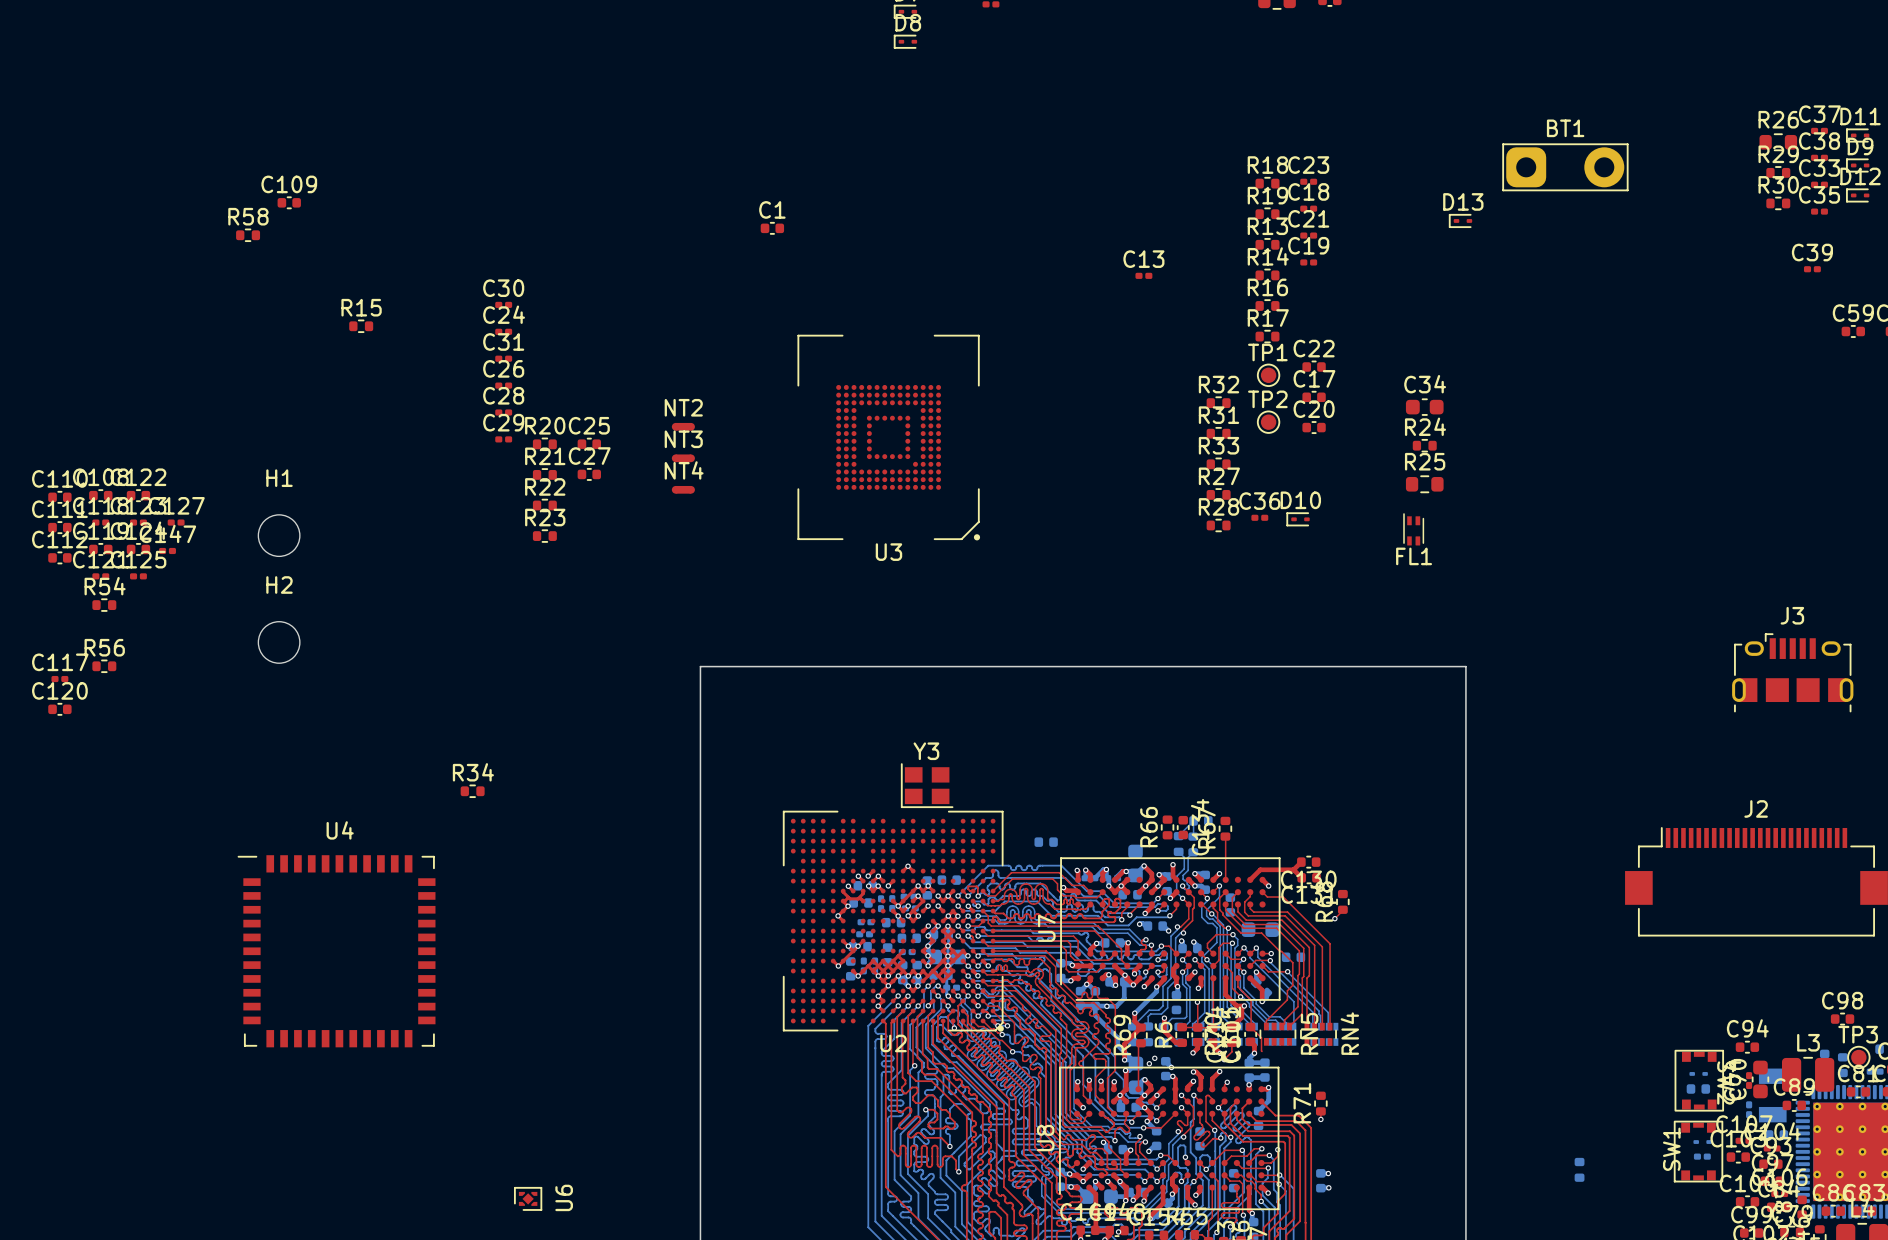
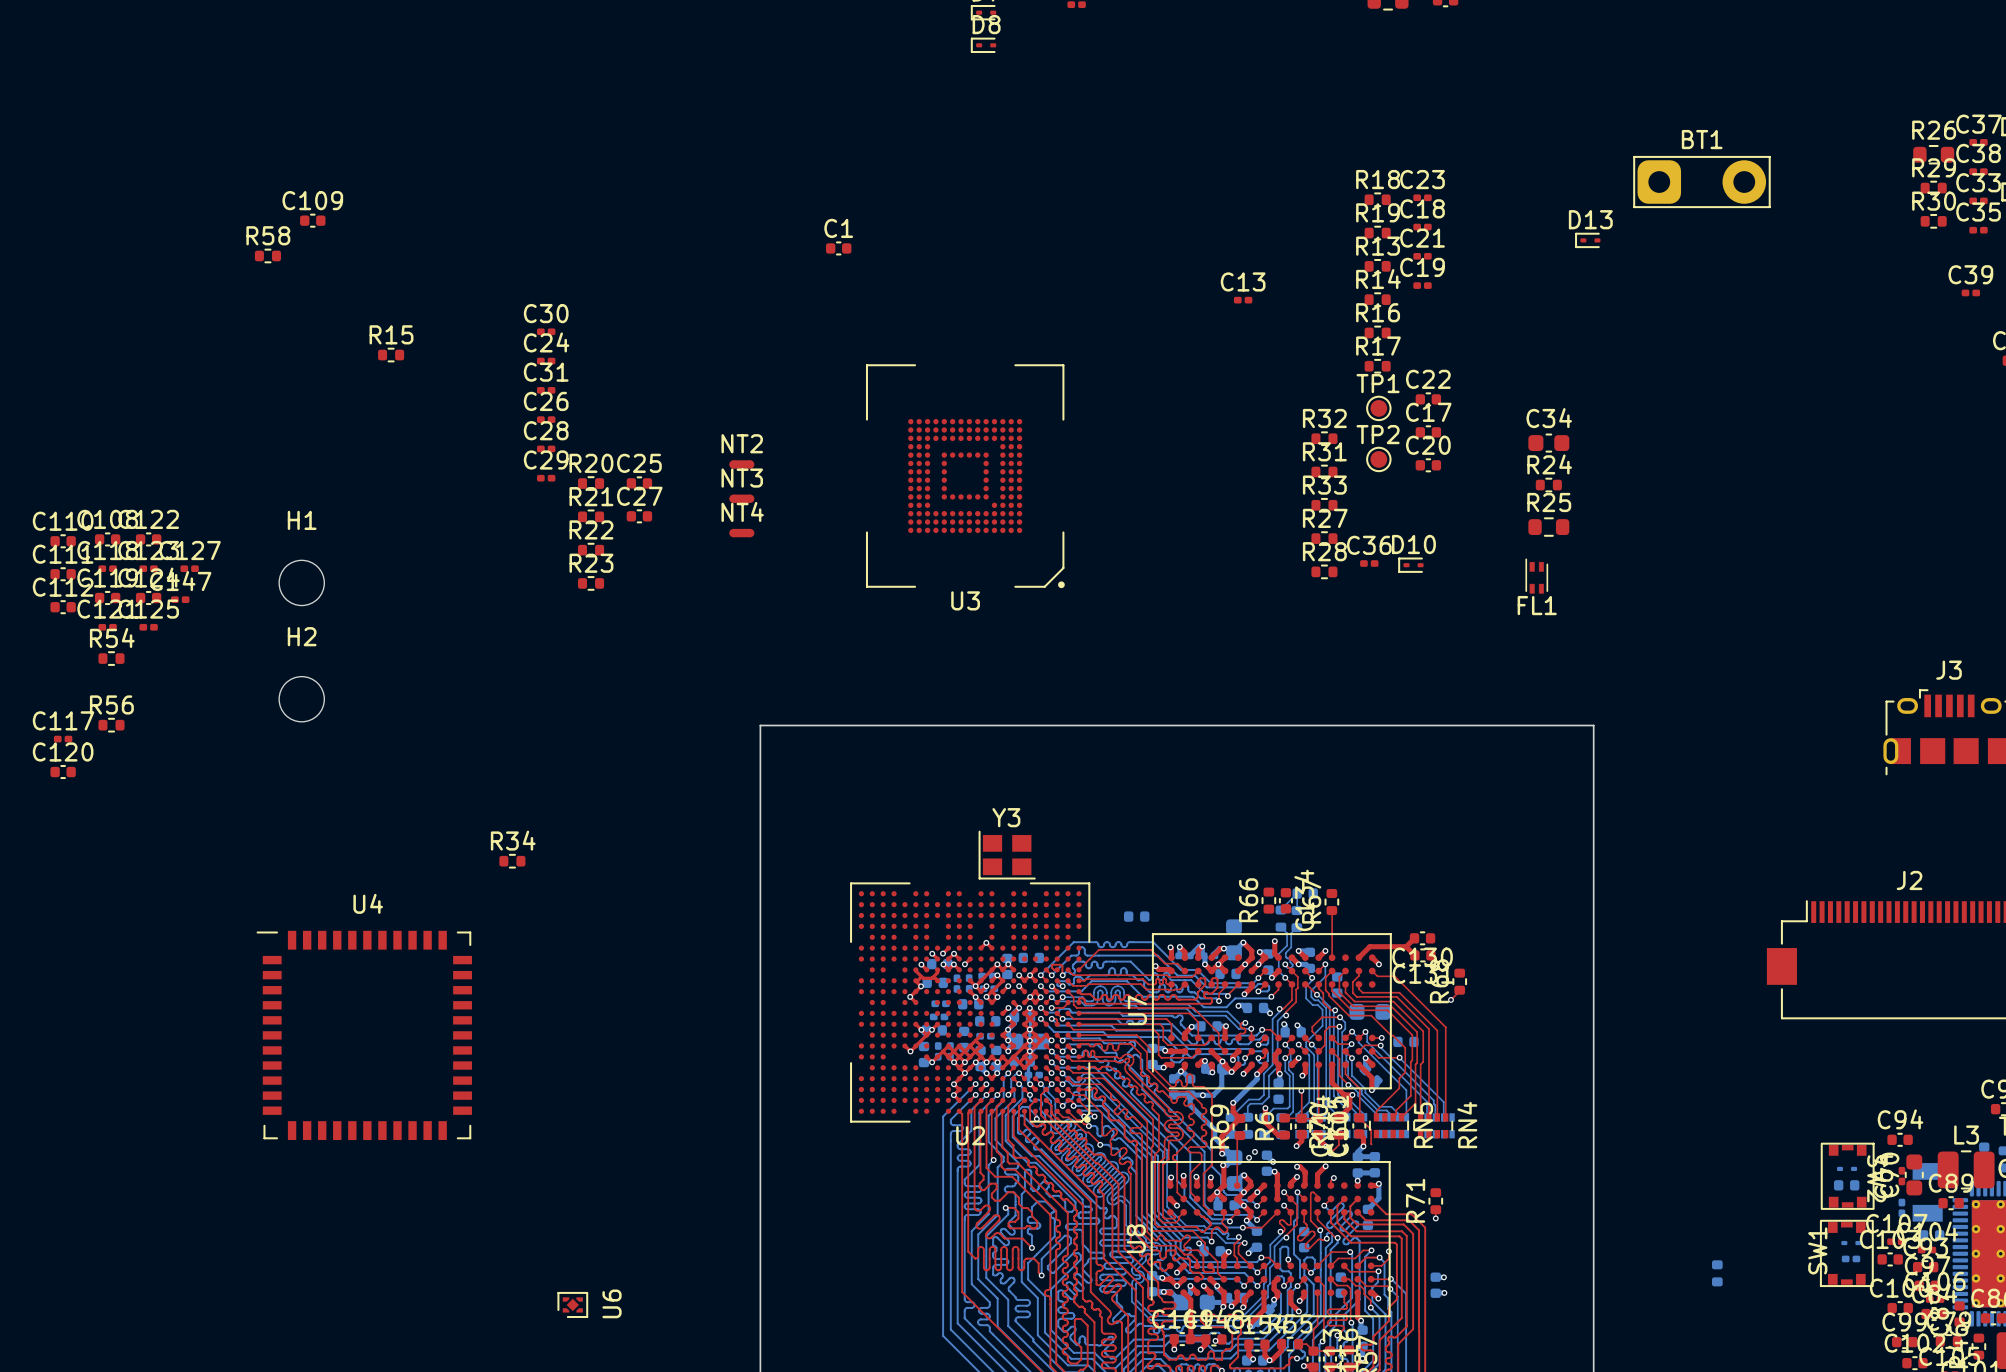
top track: (995, 895) (1012, 879) (1052, 879) (1057, 883) (1057, 889) (1063, 895) -> (1081, 975) (1155, 975)
top track: (1002, 899) (1005, 891) (1010, 889) (1015, 891) (1016, 898) (1019, 899) (1020, 887) (1026, 883) (1031, 887) (1033, 899) (1036, 886) (1040, 883) (1045, 885) (1049, 899) -> (1089, 979) (1140, 979)
top track: (1002, 904) (1007, 901) (1010, 893) (1014, 902) (1022, 902) (1026, 888) (1030, 902) (1034, 904) (1038, 901) (1041, 888) (1043, 900) (1049, 904) -> (1089, 984) (1140, 984)

